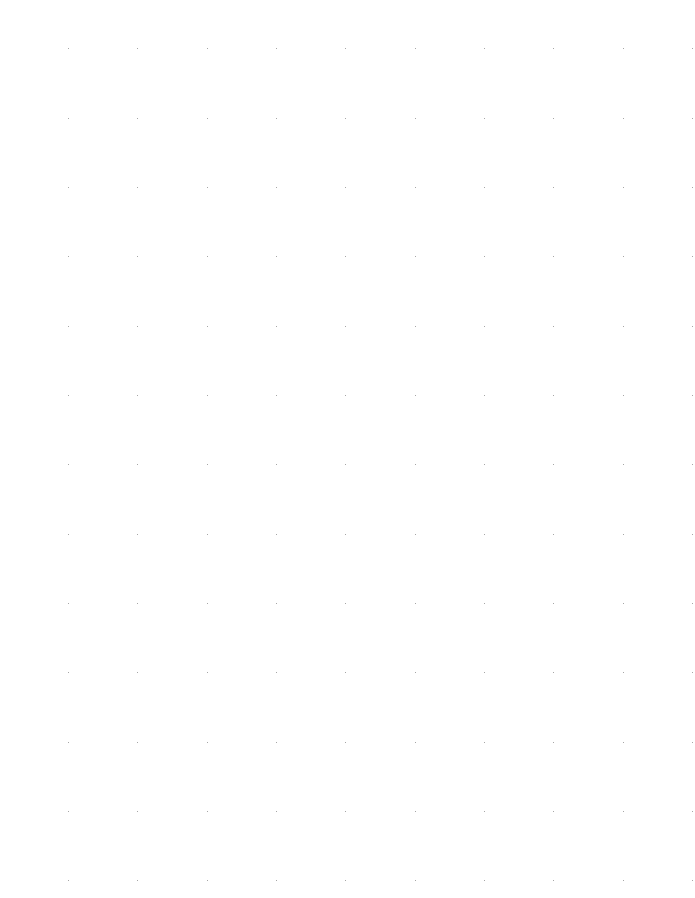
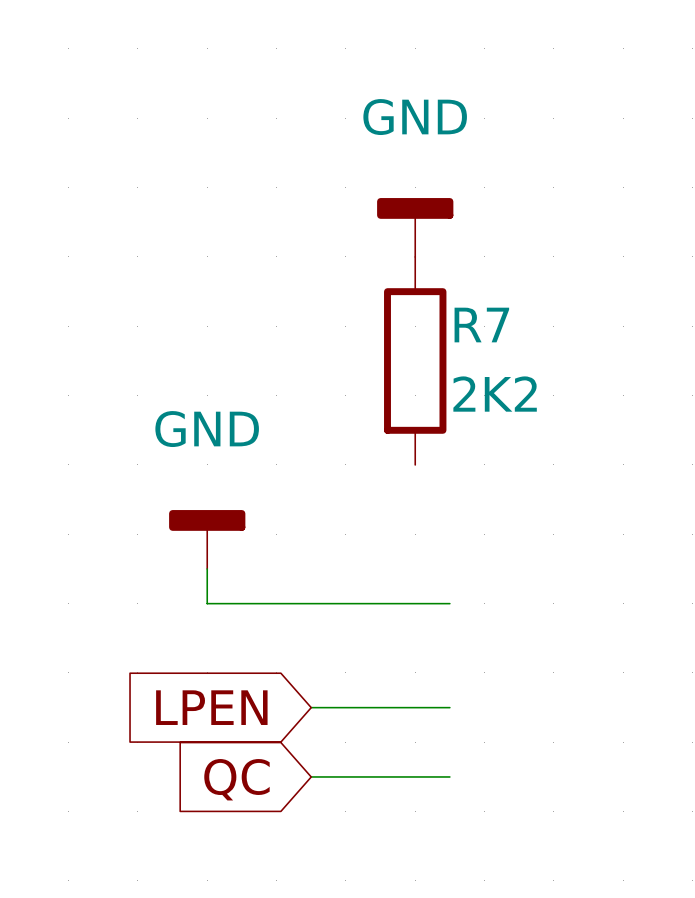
power symbol: none -> GND (415, 227)
R7: none -> 2K2 (415, 360)
power symbol: none -> GND (207, 539)
wire: none -> (207, 568) (207, 603) (449, 603)
global label: none -> LPEN (211, 707)
wire: none -> (311, 707) (449, 707)
wire: none -> (311, 776) (449, 776)
global label: none -> QC (236, 779)

